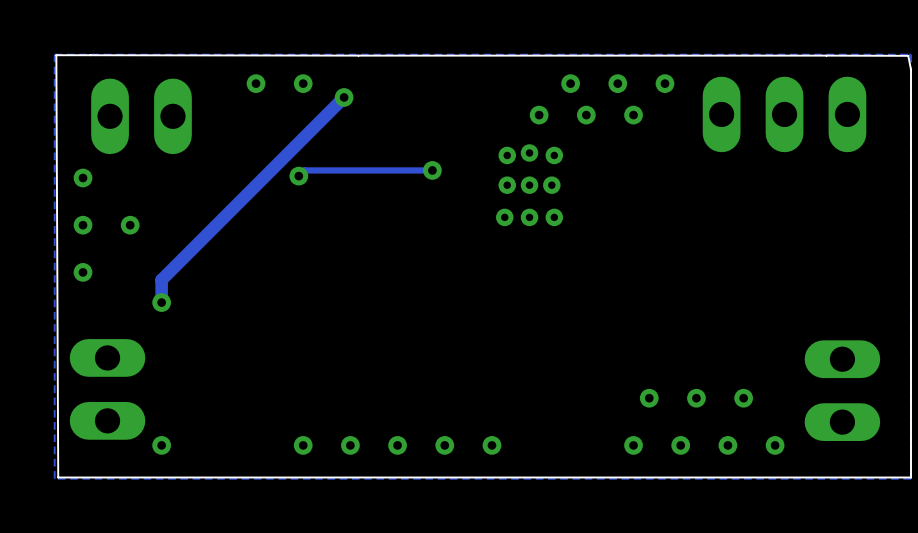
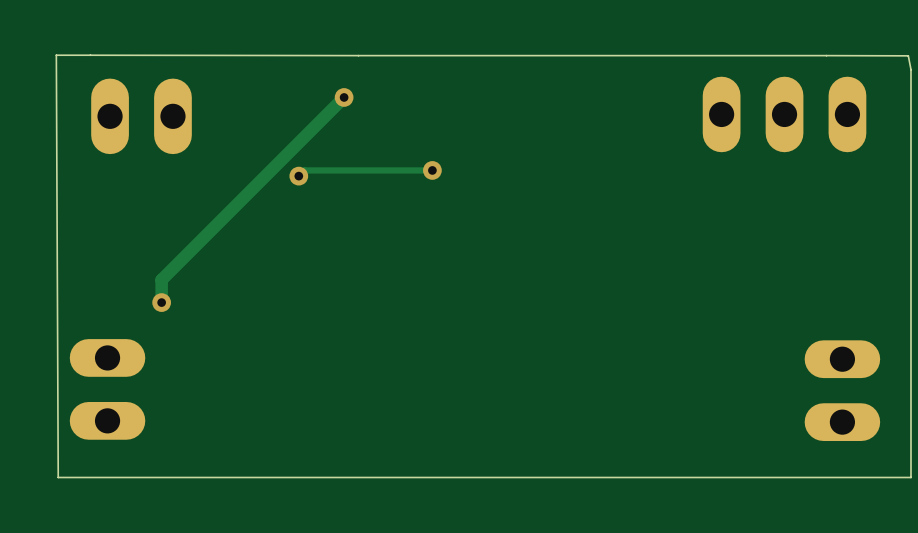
zone outline: (910, 54) (910, 478) (54, 478) (54, 54) (910, 54) -> none
via: (256, 83) -> none
via: (303, 83) -> none
via: (570, 83) -> none
via: (617, 83) -> none
via: (664, 83) -> none
via: (539, 115) -> none
via: (586, 115) -> none
via: (633, 115) -> none
via: (529, 152) -> none
via: (507, 155) -> none
via: (554, 155) -> none
via: (82, 178) -> none
via: (507, 185) -> none
via: (529, 185) -> none
via: (551, 185) -> none
via: (504, 217) -> none
via: (529, 217) -> none
via: (554, 217) -> none
via: (82, 225) -> none
via: (130, 225) -> none
via: (82, 272) -> none
via: (649, 398) -> none
via: (696, 398) -> none
via: (743, 398) -> none
via: (161, 445) -> none
via: (303, 445) -> none
via: (350, 445) -> none
via: (397, 445) -> none
via: (444, 445) -> none
via: (491, 445) -> none
via: (633, 445) -> none
via: (680, 445) -> none
via: (727, 445) -> none
via: (775, 445) -> none

